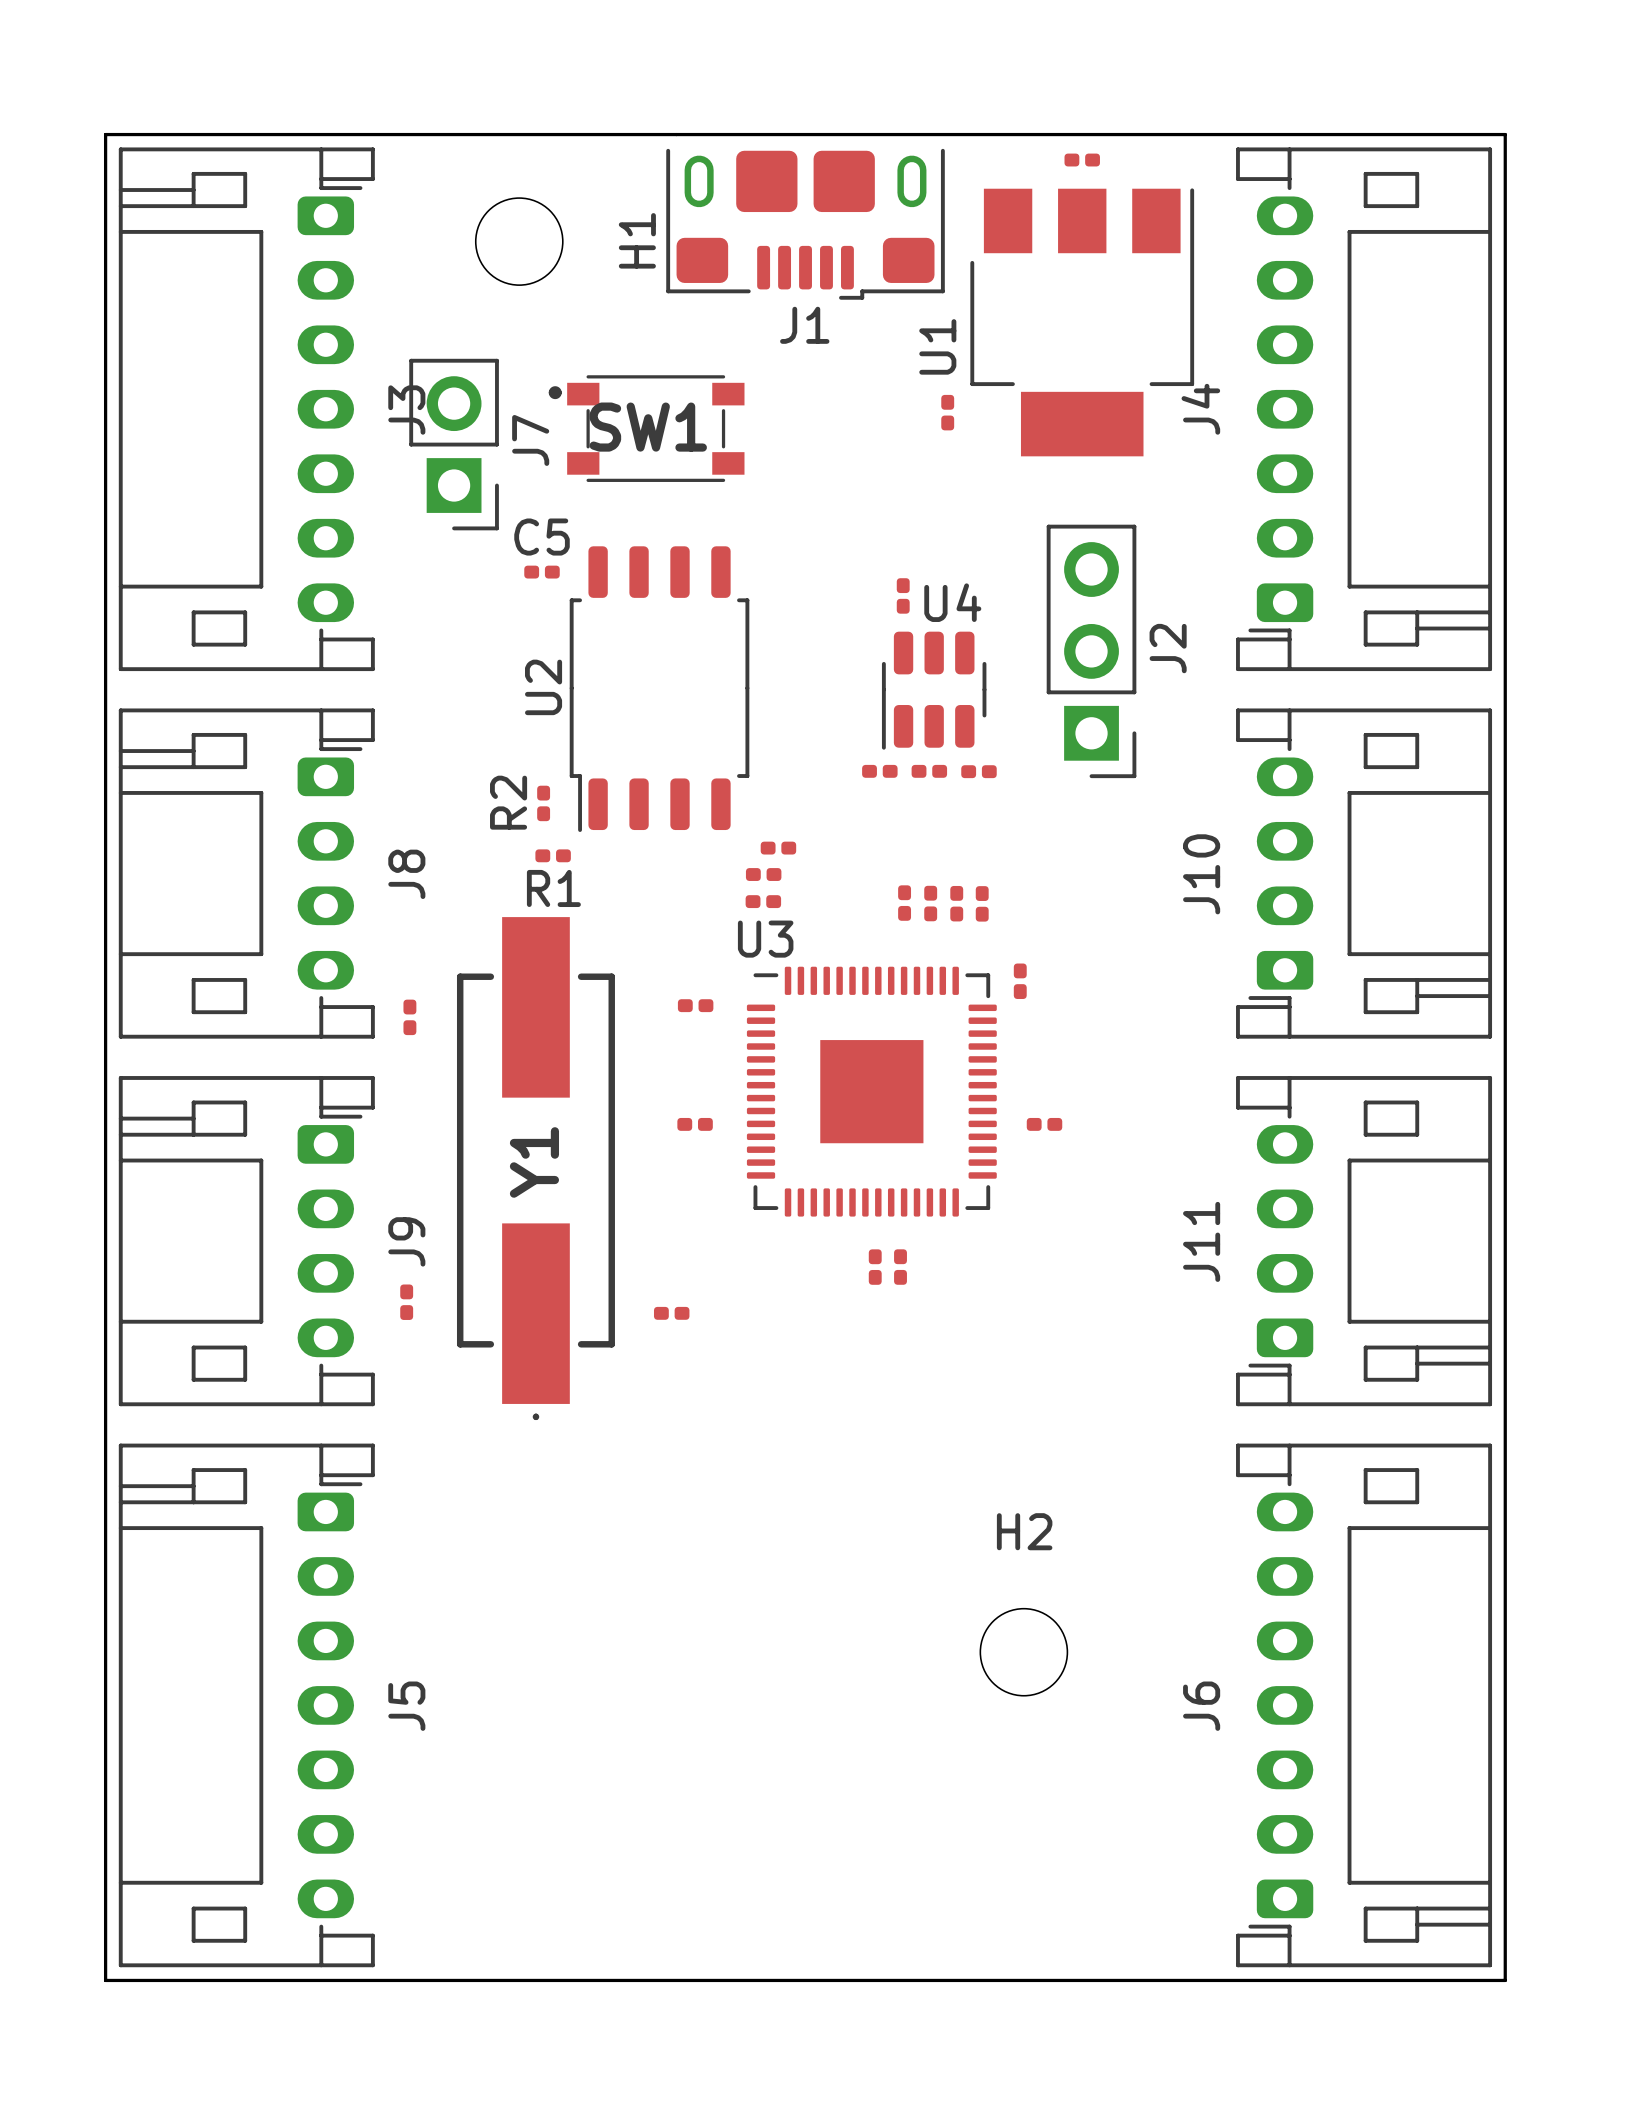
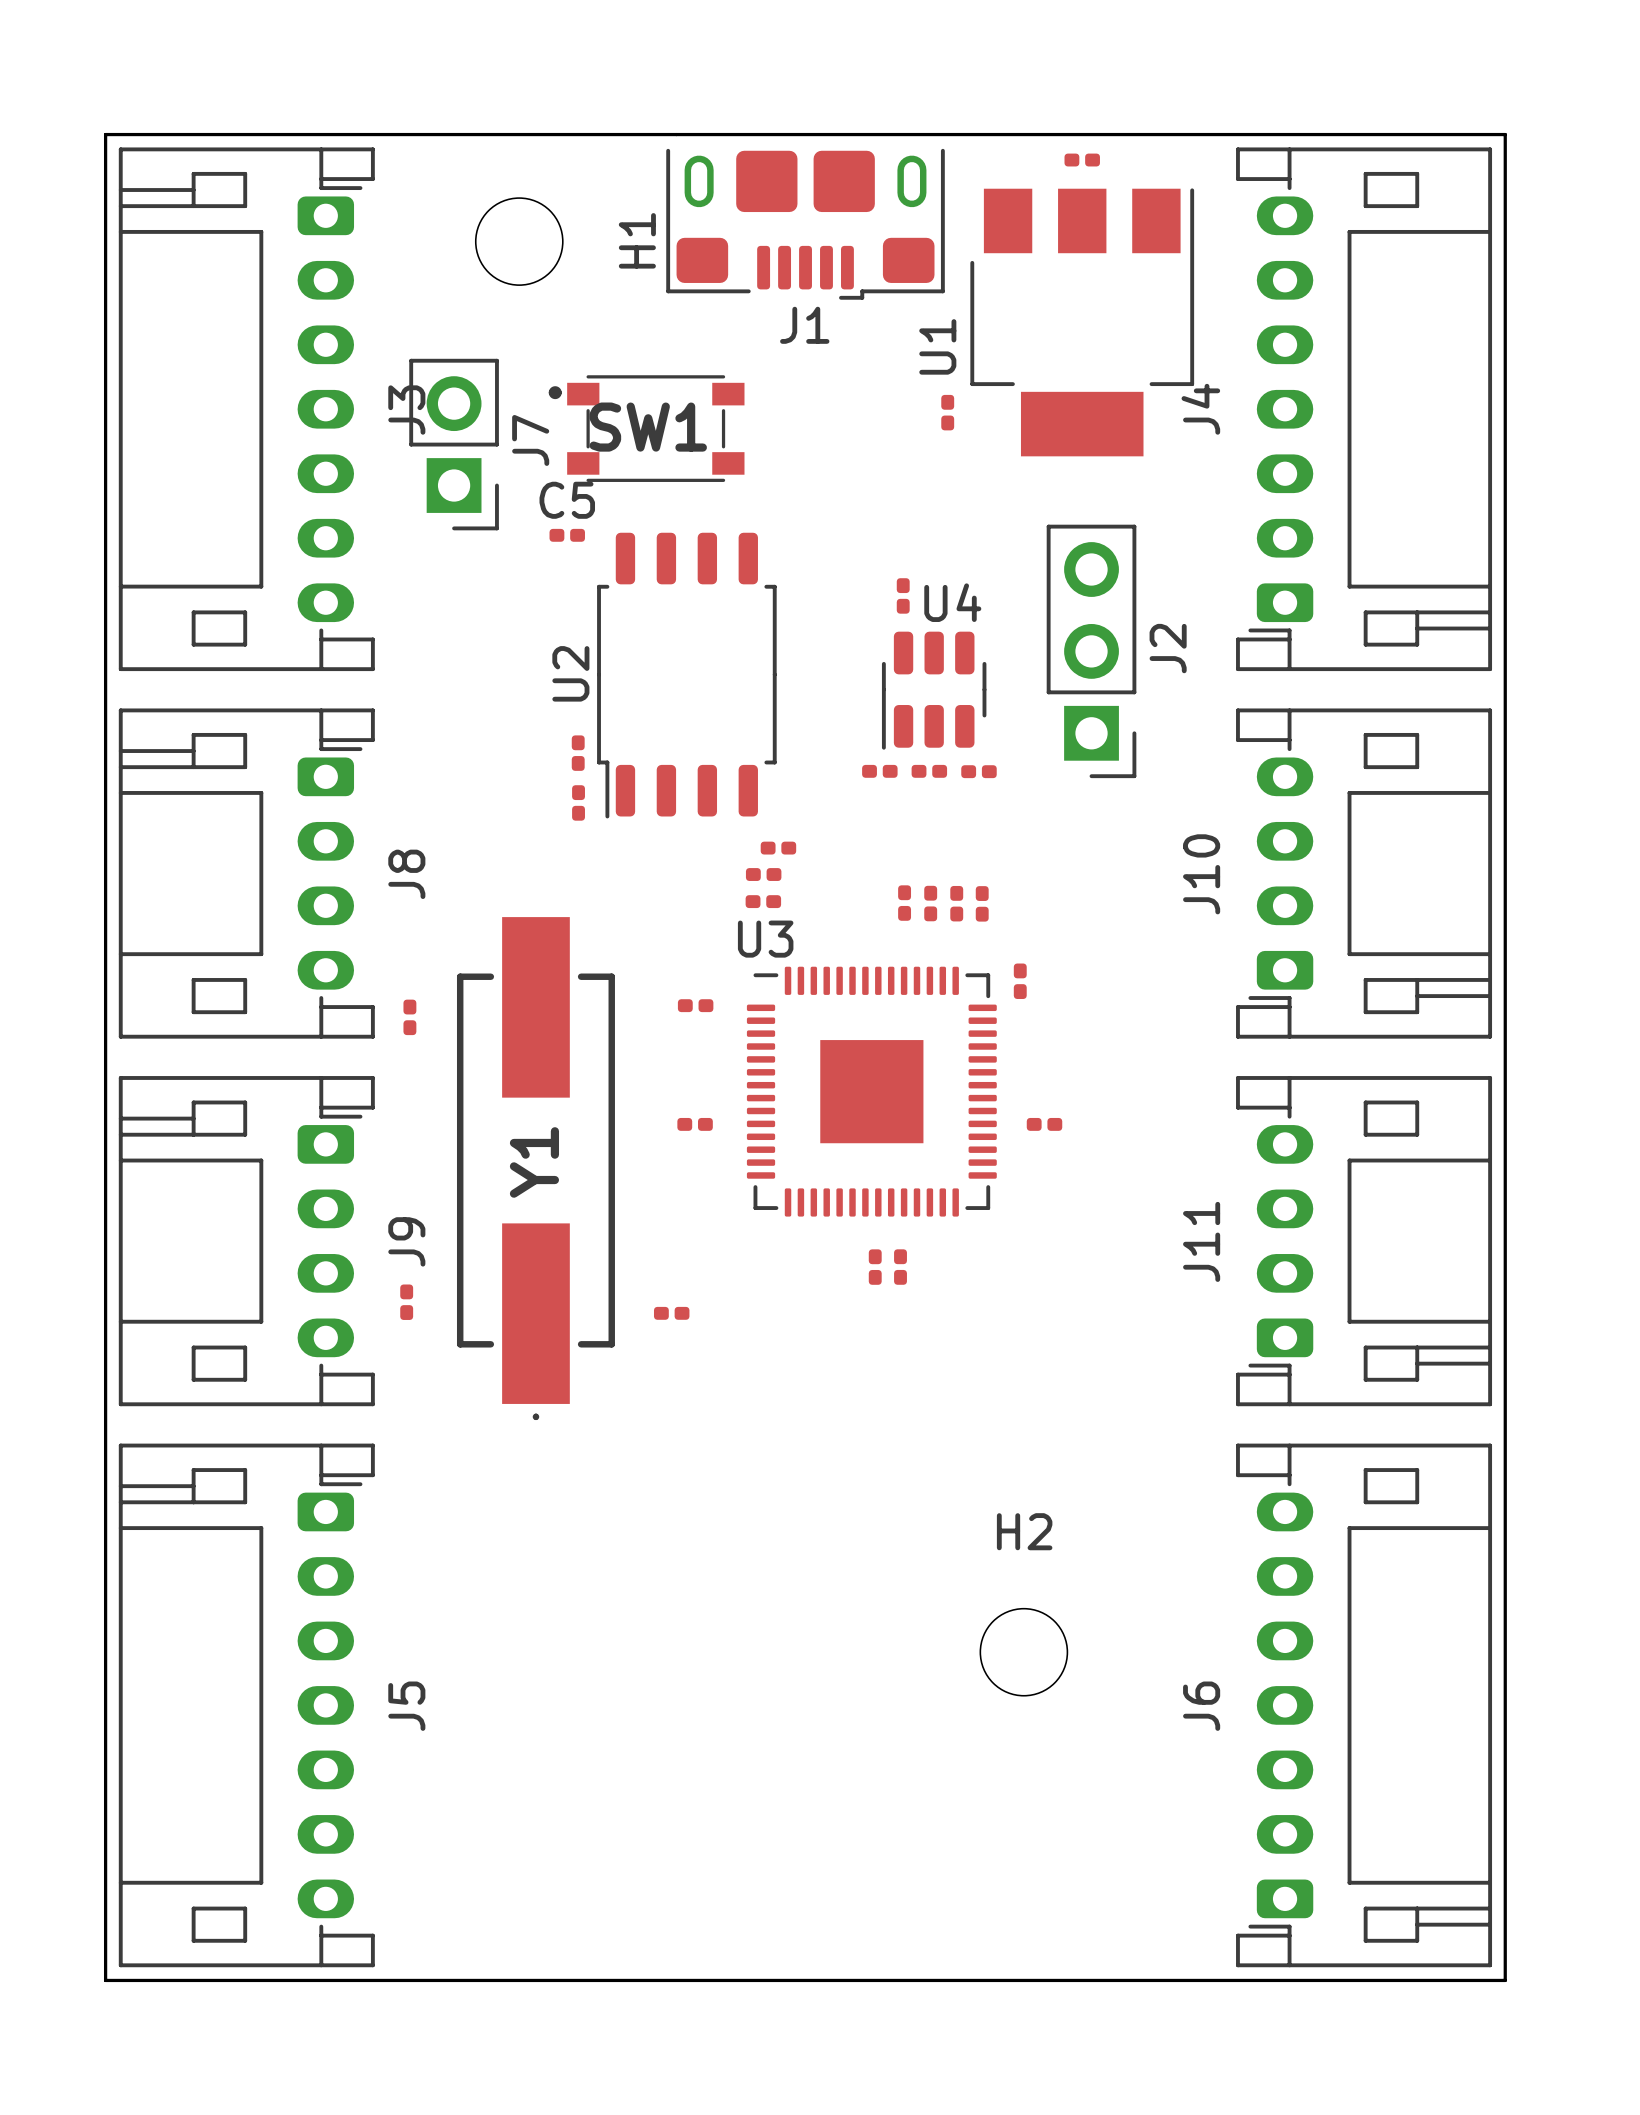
C5 position: (542, 572) -> (567, 535)
U2 position: (659, 689) -> (686, 675)
part: none -> (578, 753)
part: none -> (578, 802)
R2: (543, 803) -> none
R1: (553, 855) -> none

